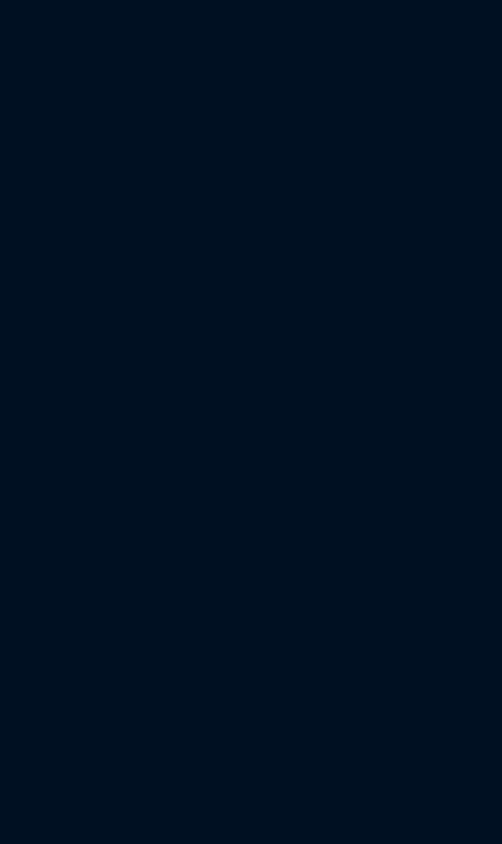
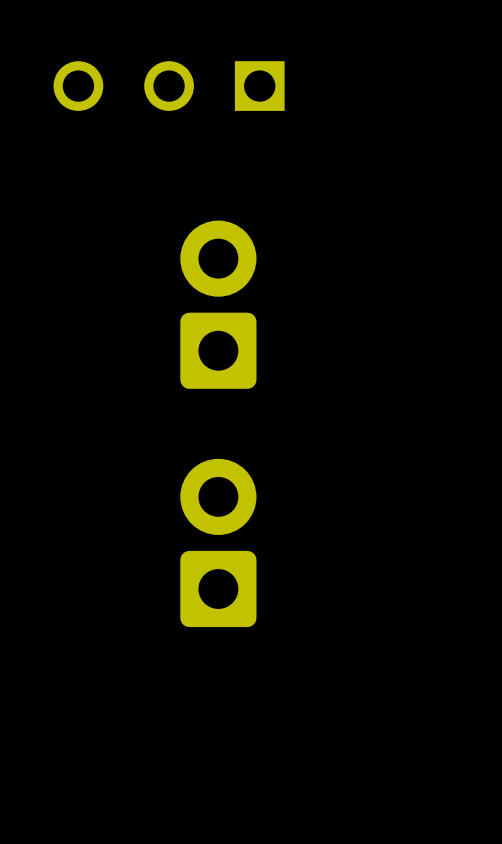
part: none -> (169, 86)
part: none -> (218, 304)
part: none -> (218, 542)

